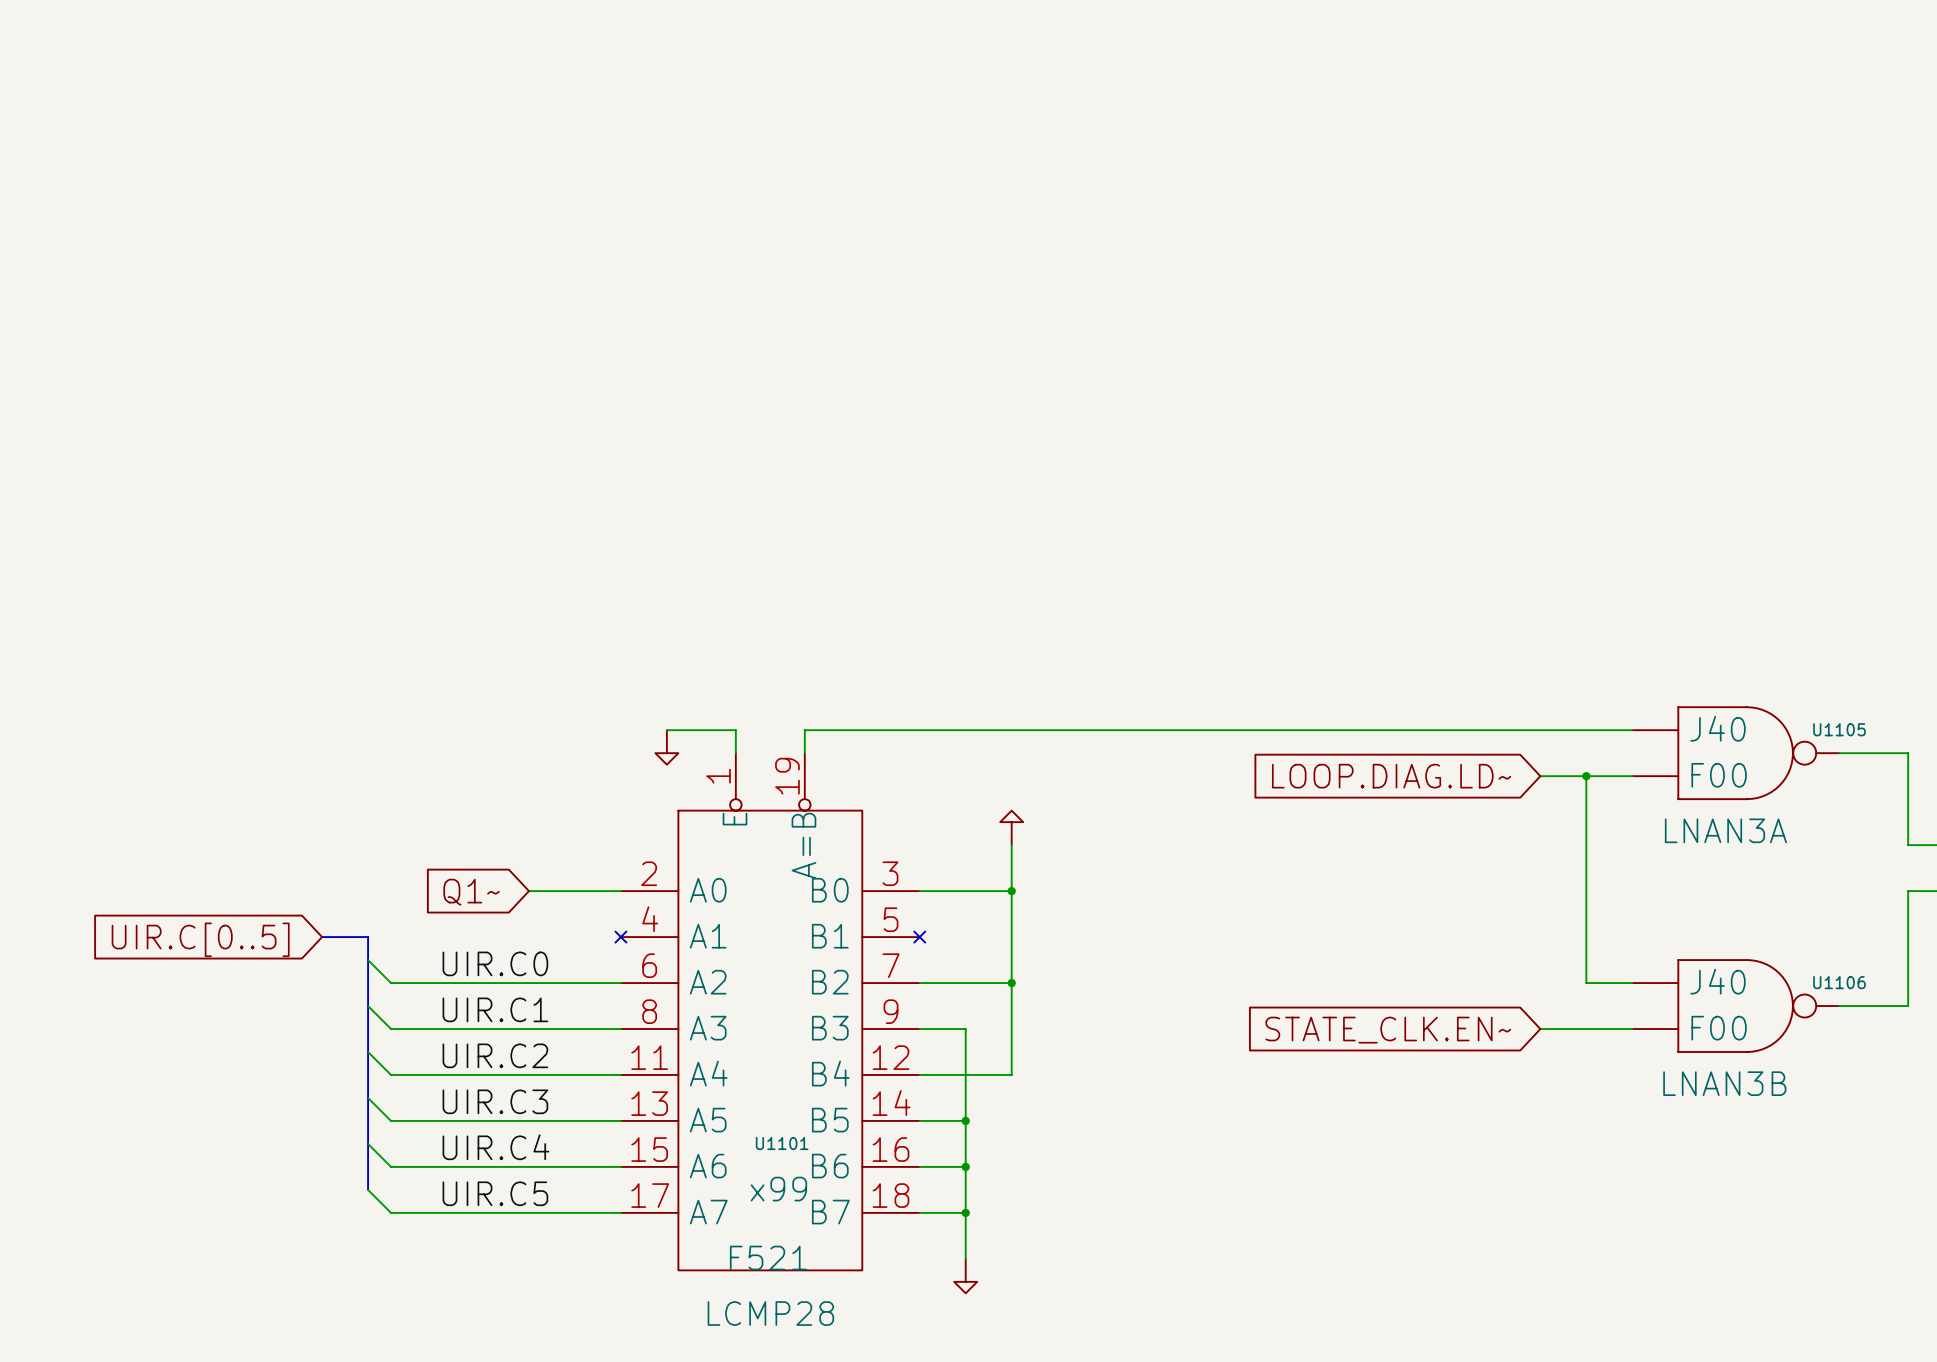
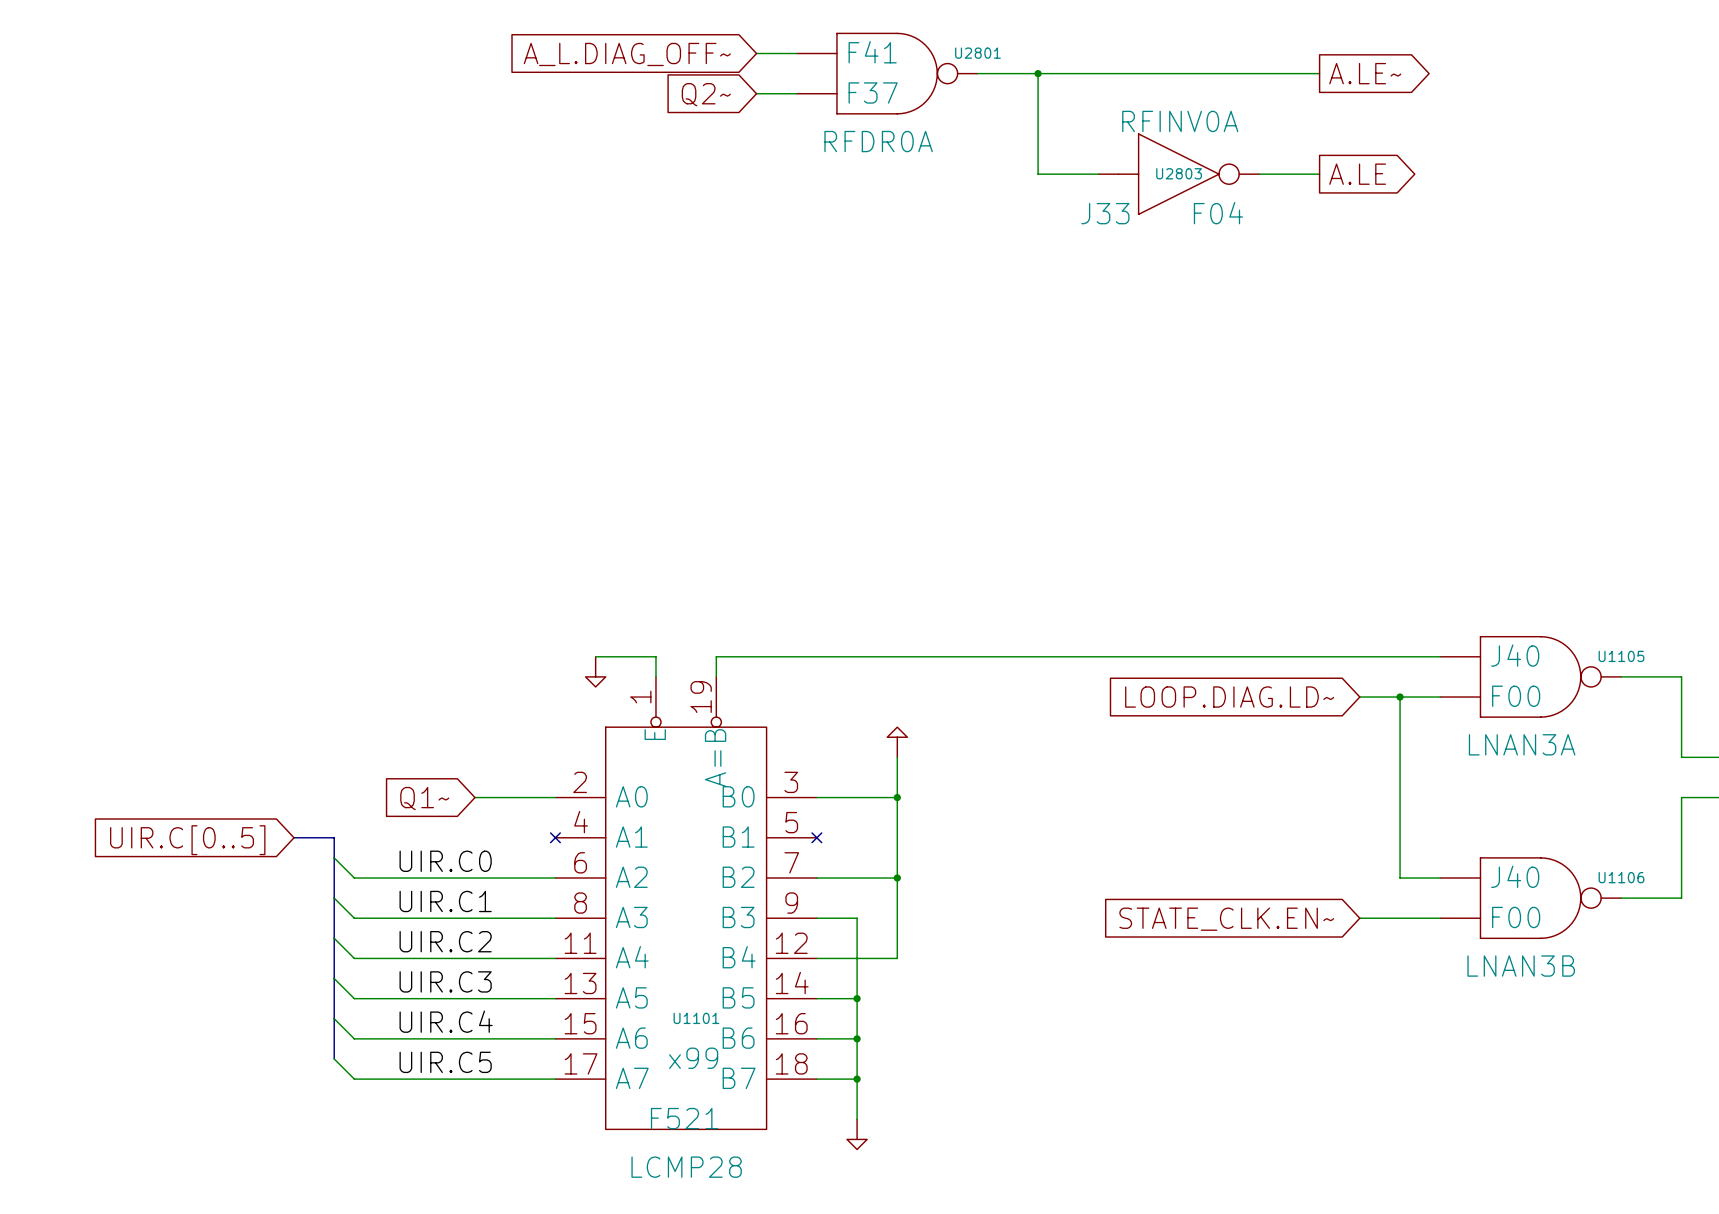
wire: none -> (756, 53) (796, 53)
global label: none -> A_L.DIAG_OFF~ (627, 54)
U2801: none -> F37 (887, 73)
wire: none -> (977, 73) (1319, 73)
wire: none -> (1038, 73) (1038, 174) (1098, 174)
junction: none -> (1038, 73)
global label: none -> A.LE~ (1365, 73)
wire: none -> (756, 93) (796, 93)
global label: none -> Q2~ (706, 94)
U2803: none -> F04 (1178, 174)
wire: none -> (1259, 174) (1319, 174)
global label: none -> A.LE (1357, 174)

